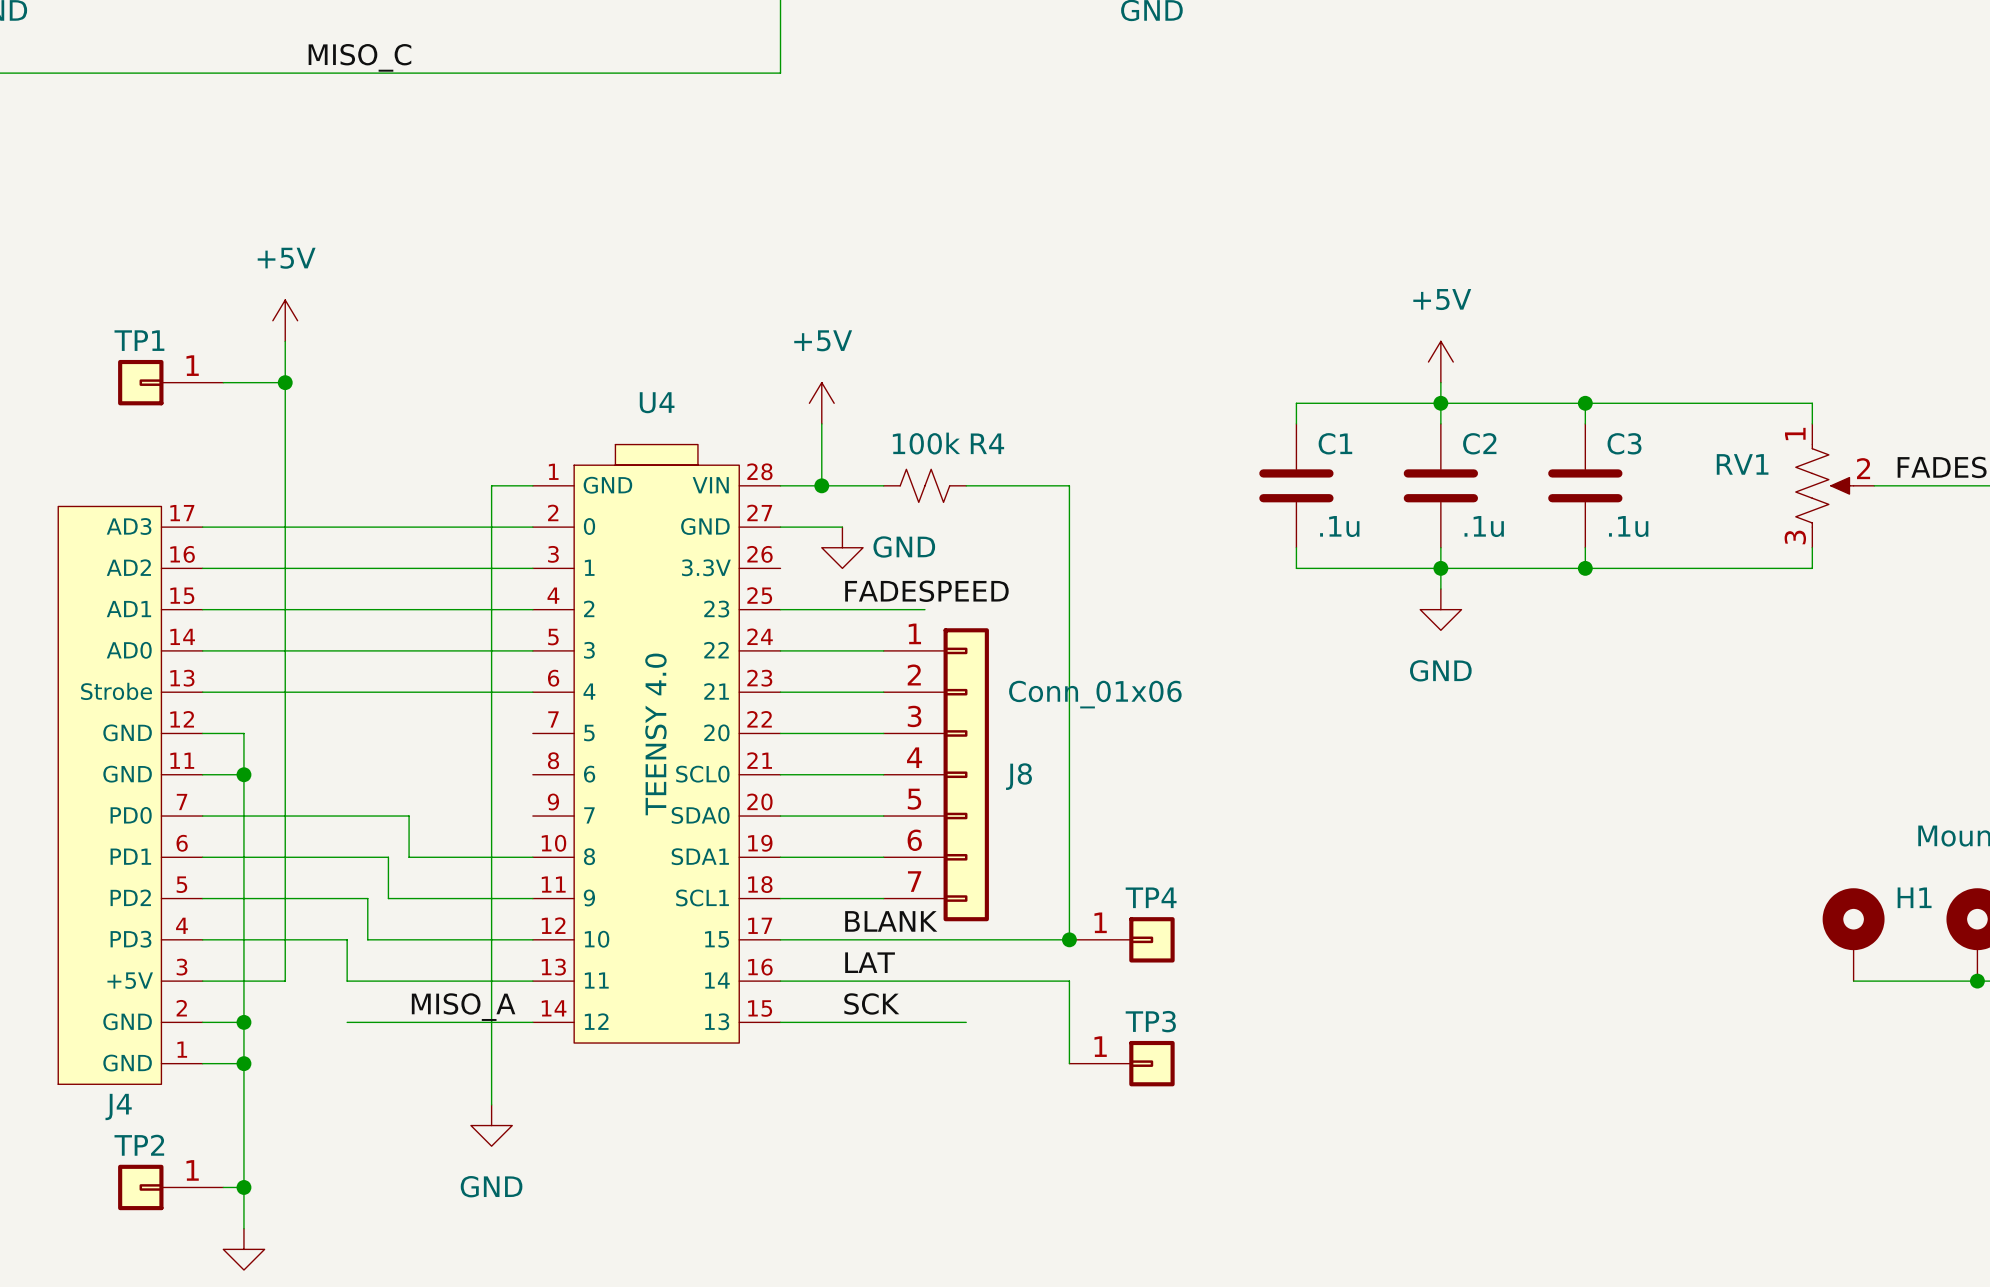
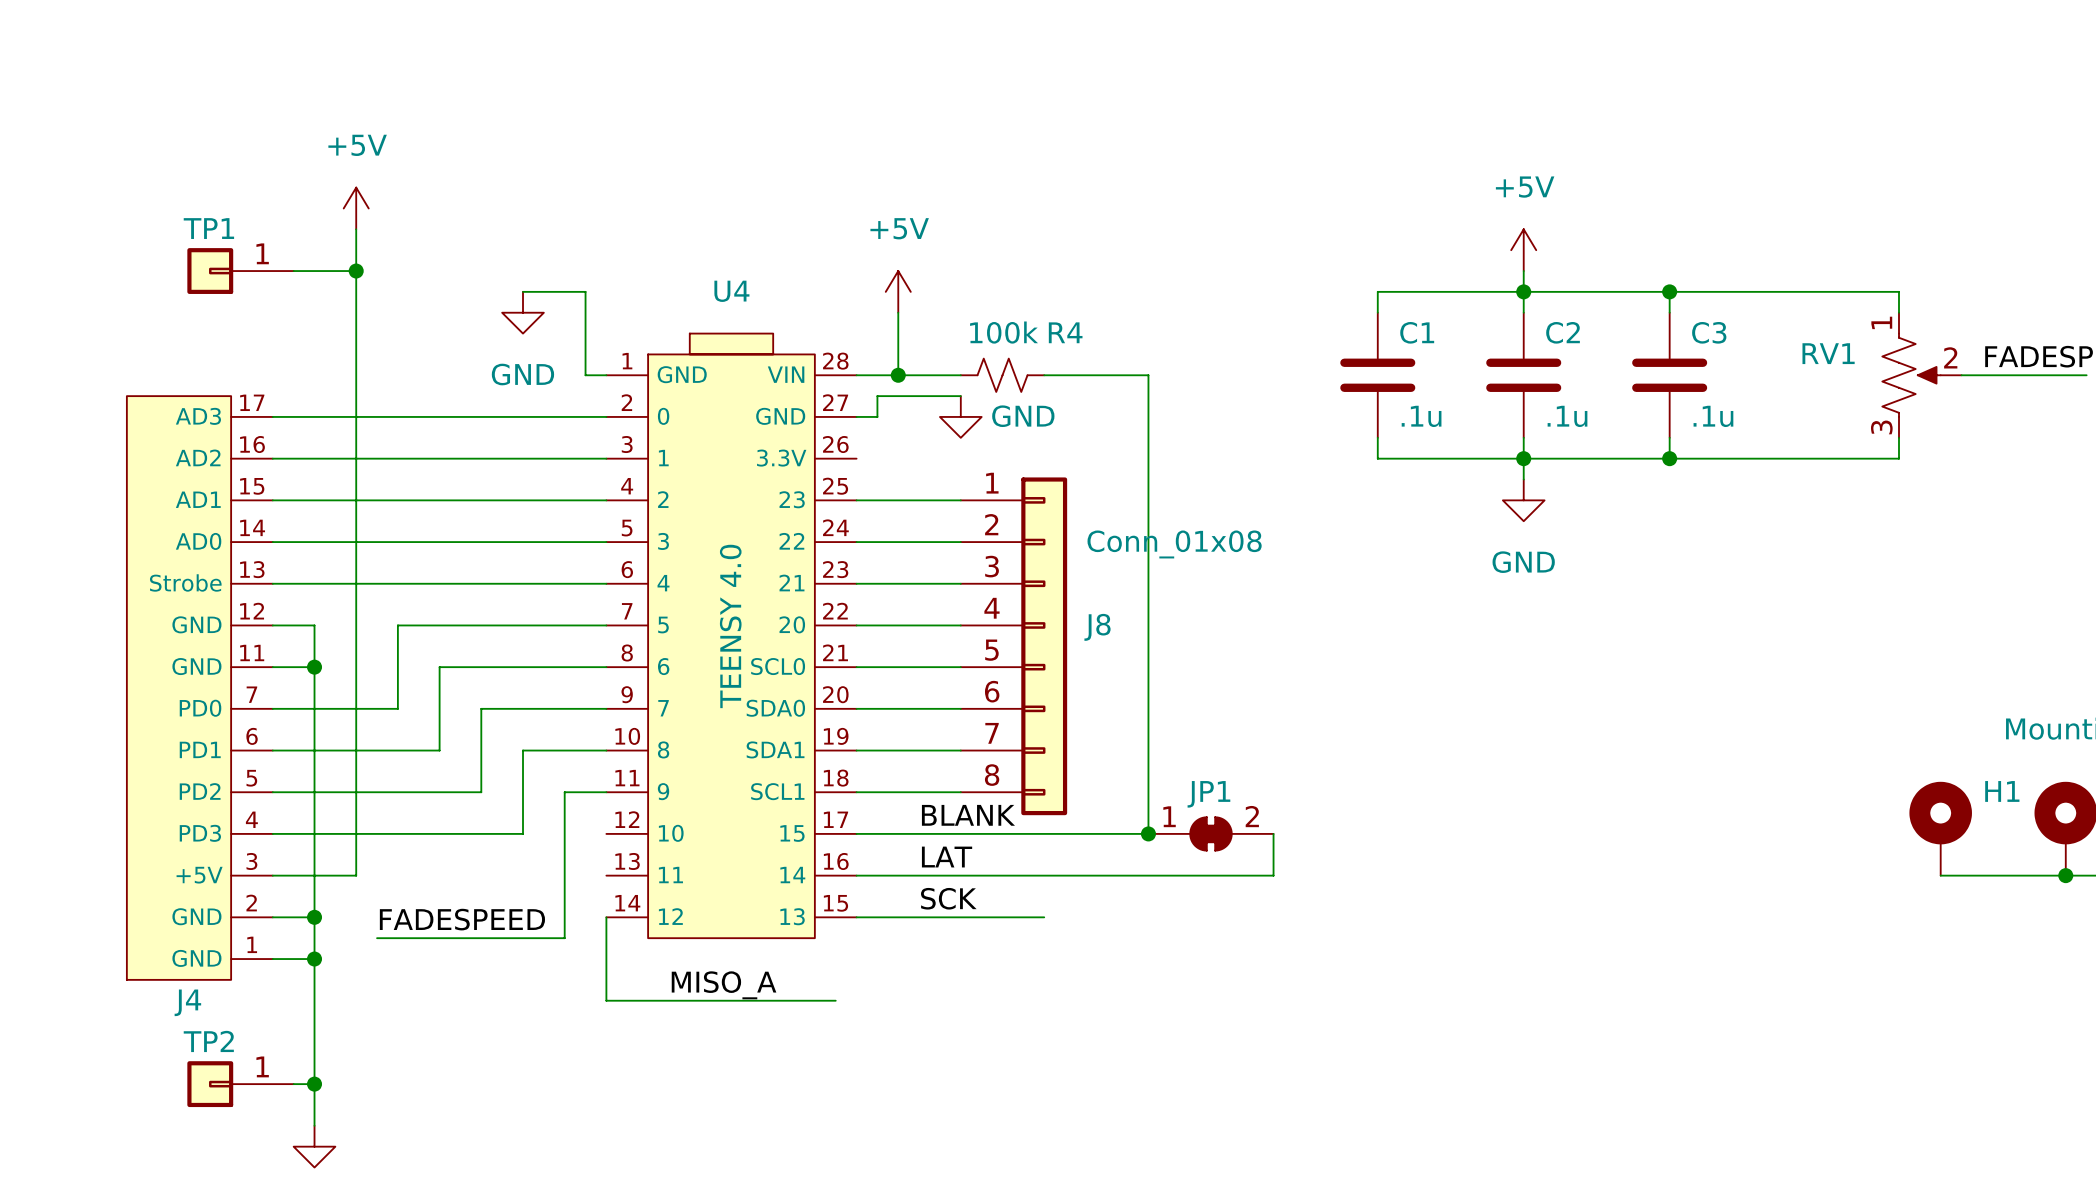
power symbol: none -> GND (523, 312)
wire: (512, 485) (491, 485) (491, 898) (409, 898) -> (585, 375) (585, 291) (523, 291)
wire: (801, 527) (842, 527) -> (877, 416) (877, 396) (960, 396)
power symbol position: GND (842, 547) -> GND (960, 416)
label: FADESPEED (926, 591) -> none
J8 symbol: [883, 628, 989, 922] -> [960, 477, 1068, 816]
J8 value: Conn_01x06 (1095, 694) -> Conn_01x08 (1174, 544)
wire: none -> (606, 667) (439, 667) (439, 750)
wire: (326, 816) (409, 816) -> (397, 708) (397, 625) (606, 625)
wire: none -> (481, 708) (606, 708)
wire: (367, 857) (388, 857) (388, 898) -> (439, 792) (460, 792)
wire: (409, 857) (450, 857) -> (481, 750) (481, 792)
wire: (367, 898) (367, 939) -> (418, 833) (439, 833)
wire: (347, 939) (347, 981) (532, 981) -> none
wire: (450, 939) (532, 939) -> (523, 833) (523, 750)
TP4: (1122, 939) -> none
JP1: none -> (1211, 833)
wire: (1069, 981) (1069, 1063) -> (1148, 875) (1273, 875) (1273, 833)
label position: MISO_A (463, 1007) -> MISO_A (724, 985)
wire: (347, 1022) (532, 1022) -> (835, 1000) (606, 1000) (606, 917)
label: none -> FADESPEED (462, 919)
wire: (491, 1043) (491, 1104) -> (564, 938) (377, 938)
TP3: (1122, 1063) -> none
power symbol: GND (491, 1125) -> none

